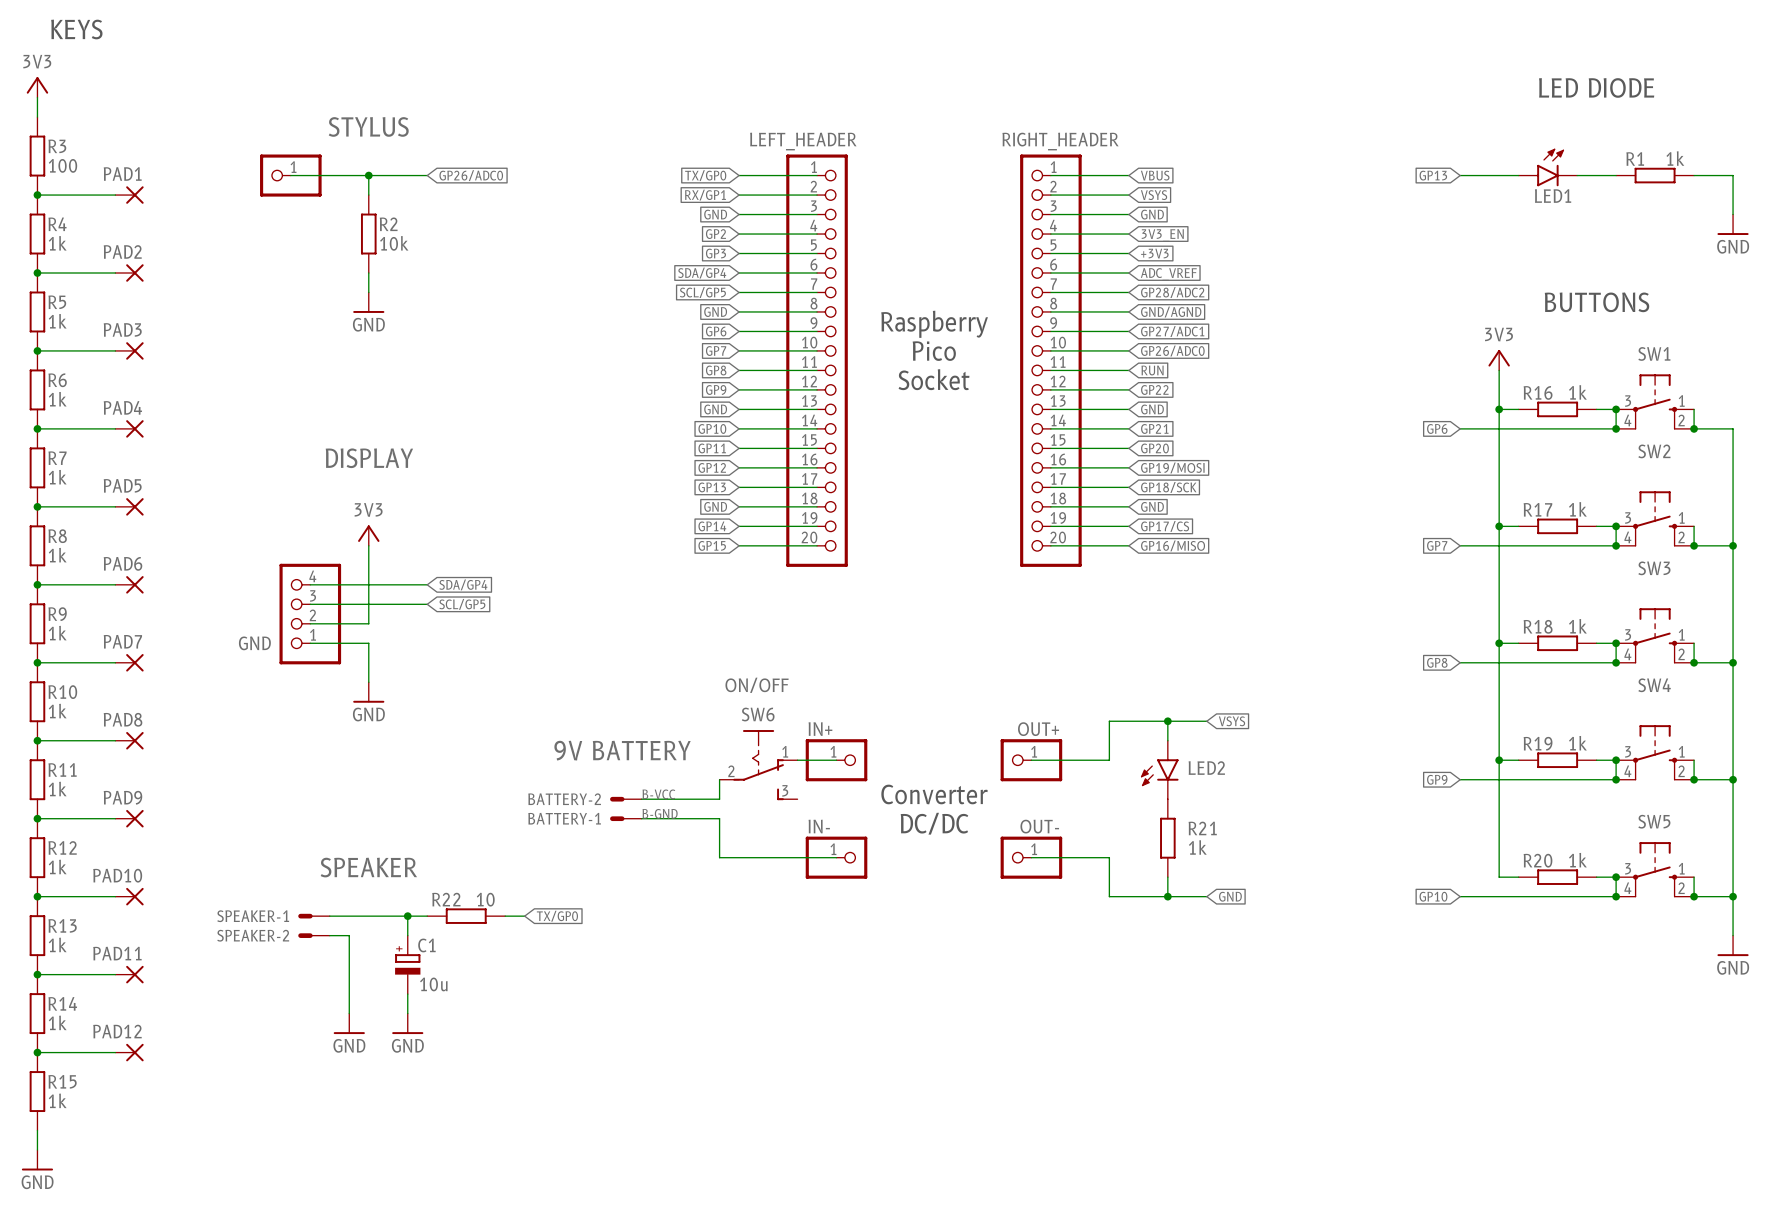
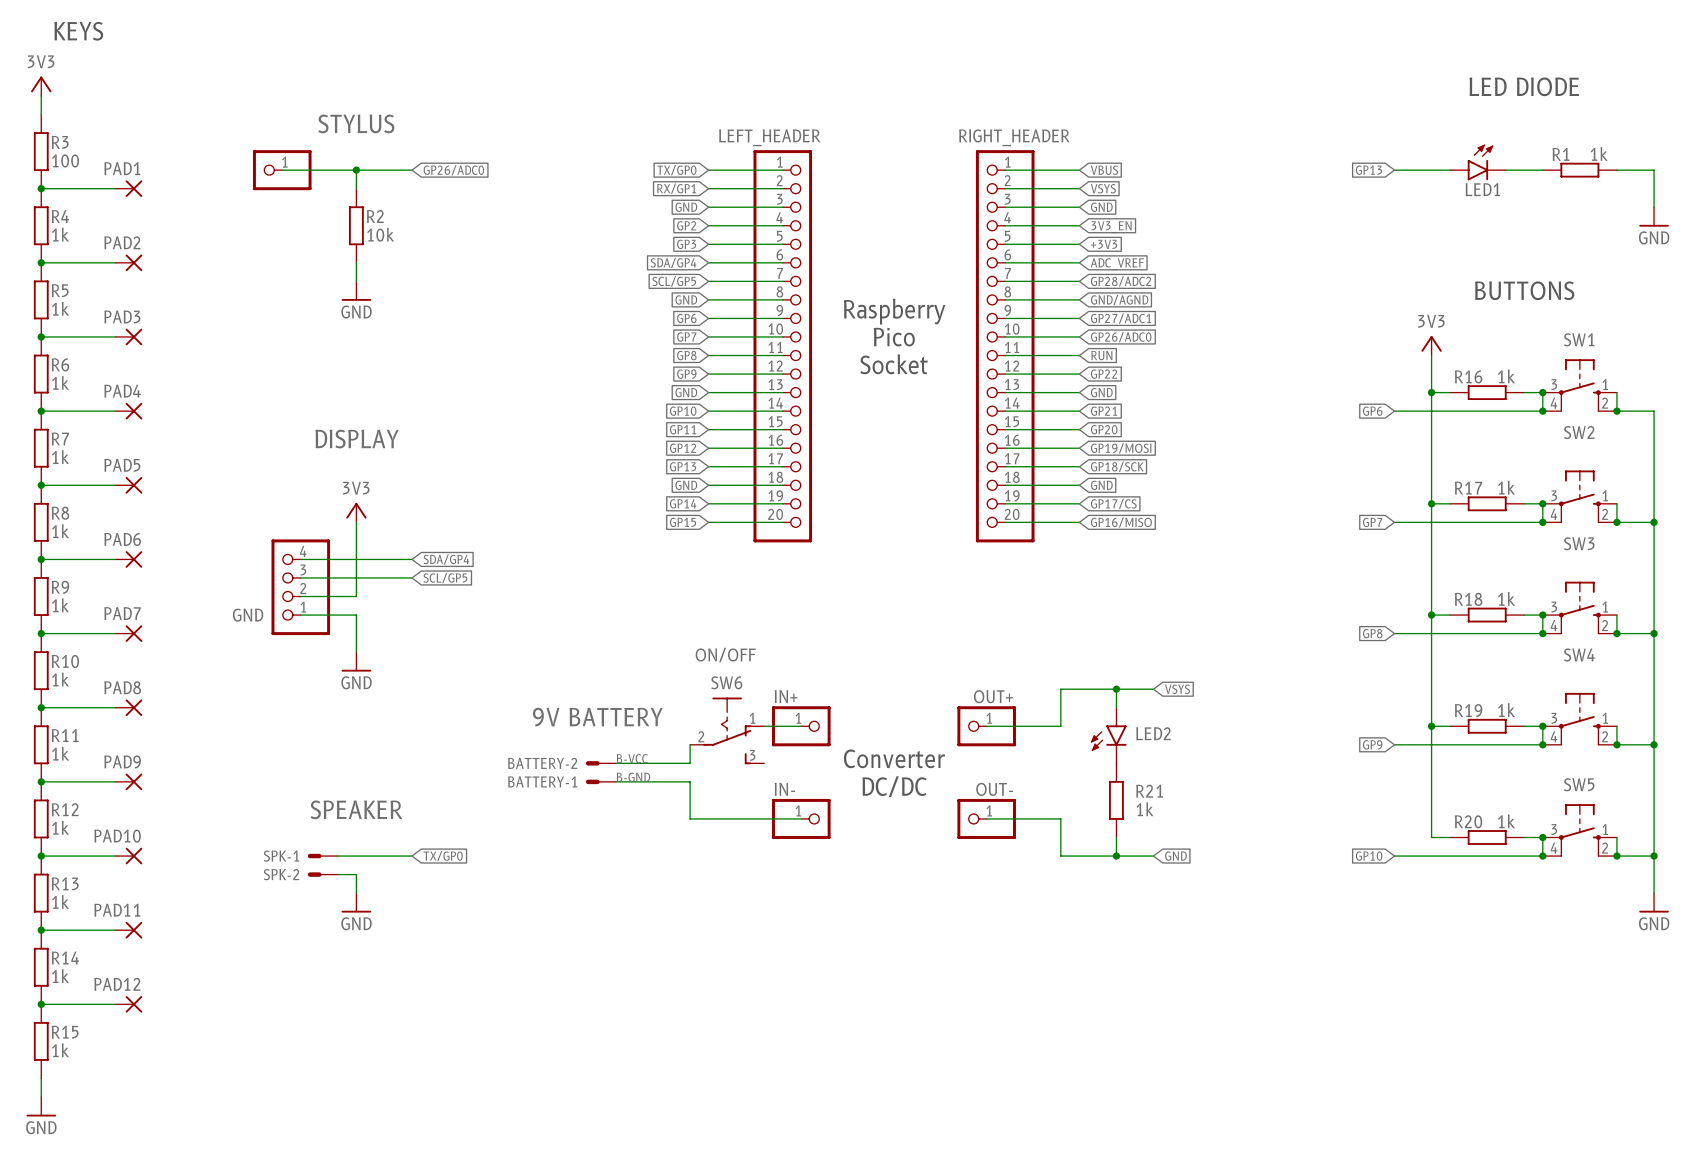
SPK-1: none -> SPEAKER (322, 856)
wire: none -> (337, 856) (412, 856)
SPEAKER-1: SPEAKER (314, 916) -> none
SPK-2: none -> (322, 874)
wire: (368, 916) (427, 916) -> (356, 874) (356, 893)
wire: (407, 916) (407, 935) -> none
junction: (407, 916) -> none
R22: 10 (466, 916) -> none
wire: (505, 916) (524, 916) -> none
global label position: TX/GP0 (557, 916) -> TX/GP0 (443, 856)
SPEAKER-2: (314, 935) -> none
wire: (329, 935) (349, 935) (349, 1013) -> none
power symbol: none -> GND (356, 902)
C1: 10u (407, 964) -> none
wire: (407, 994) (407, 1013) -> none
power symbol: GND (349, 1023) -> none
power symbol: GND (407, 1023) -> none

